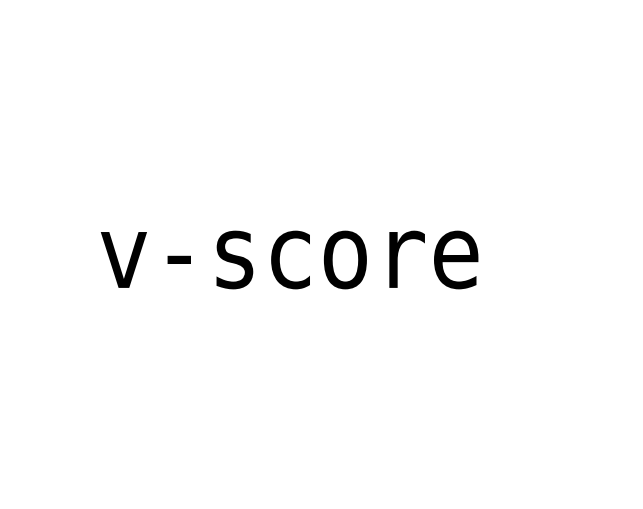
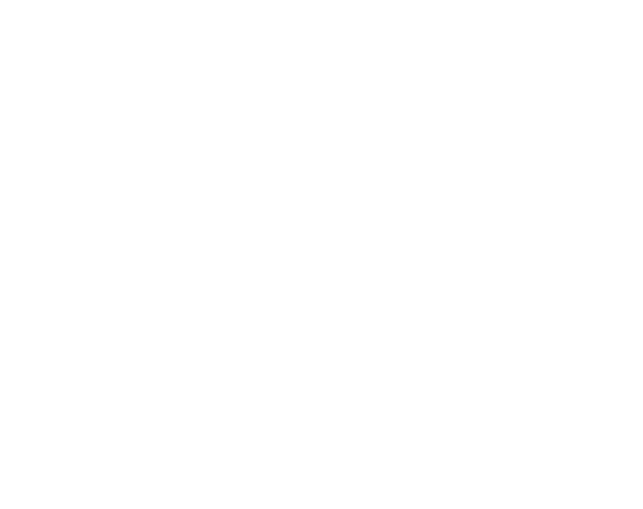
text: v-score (289, 260) -> none

